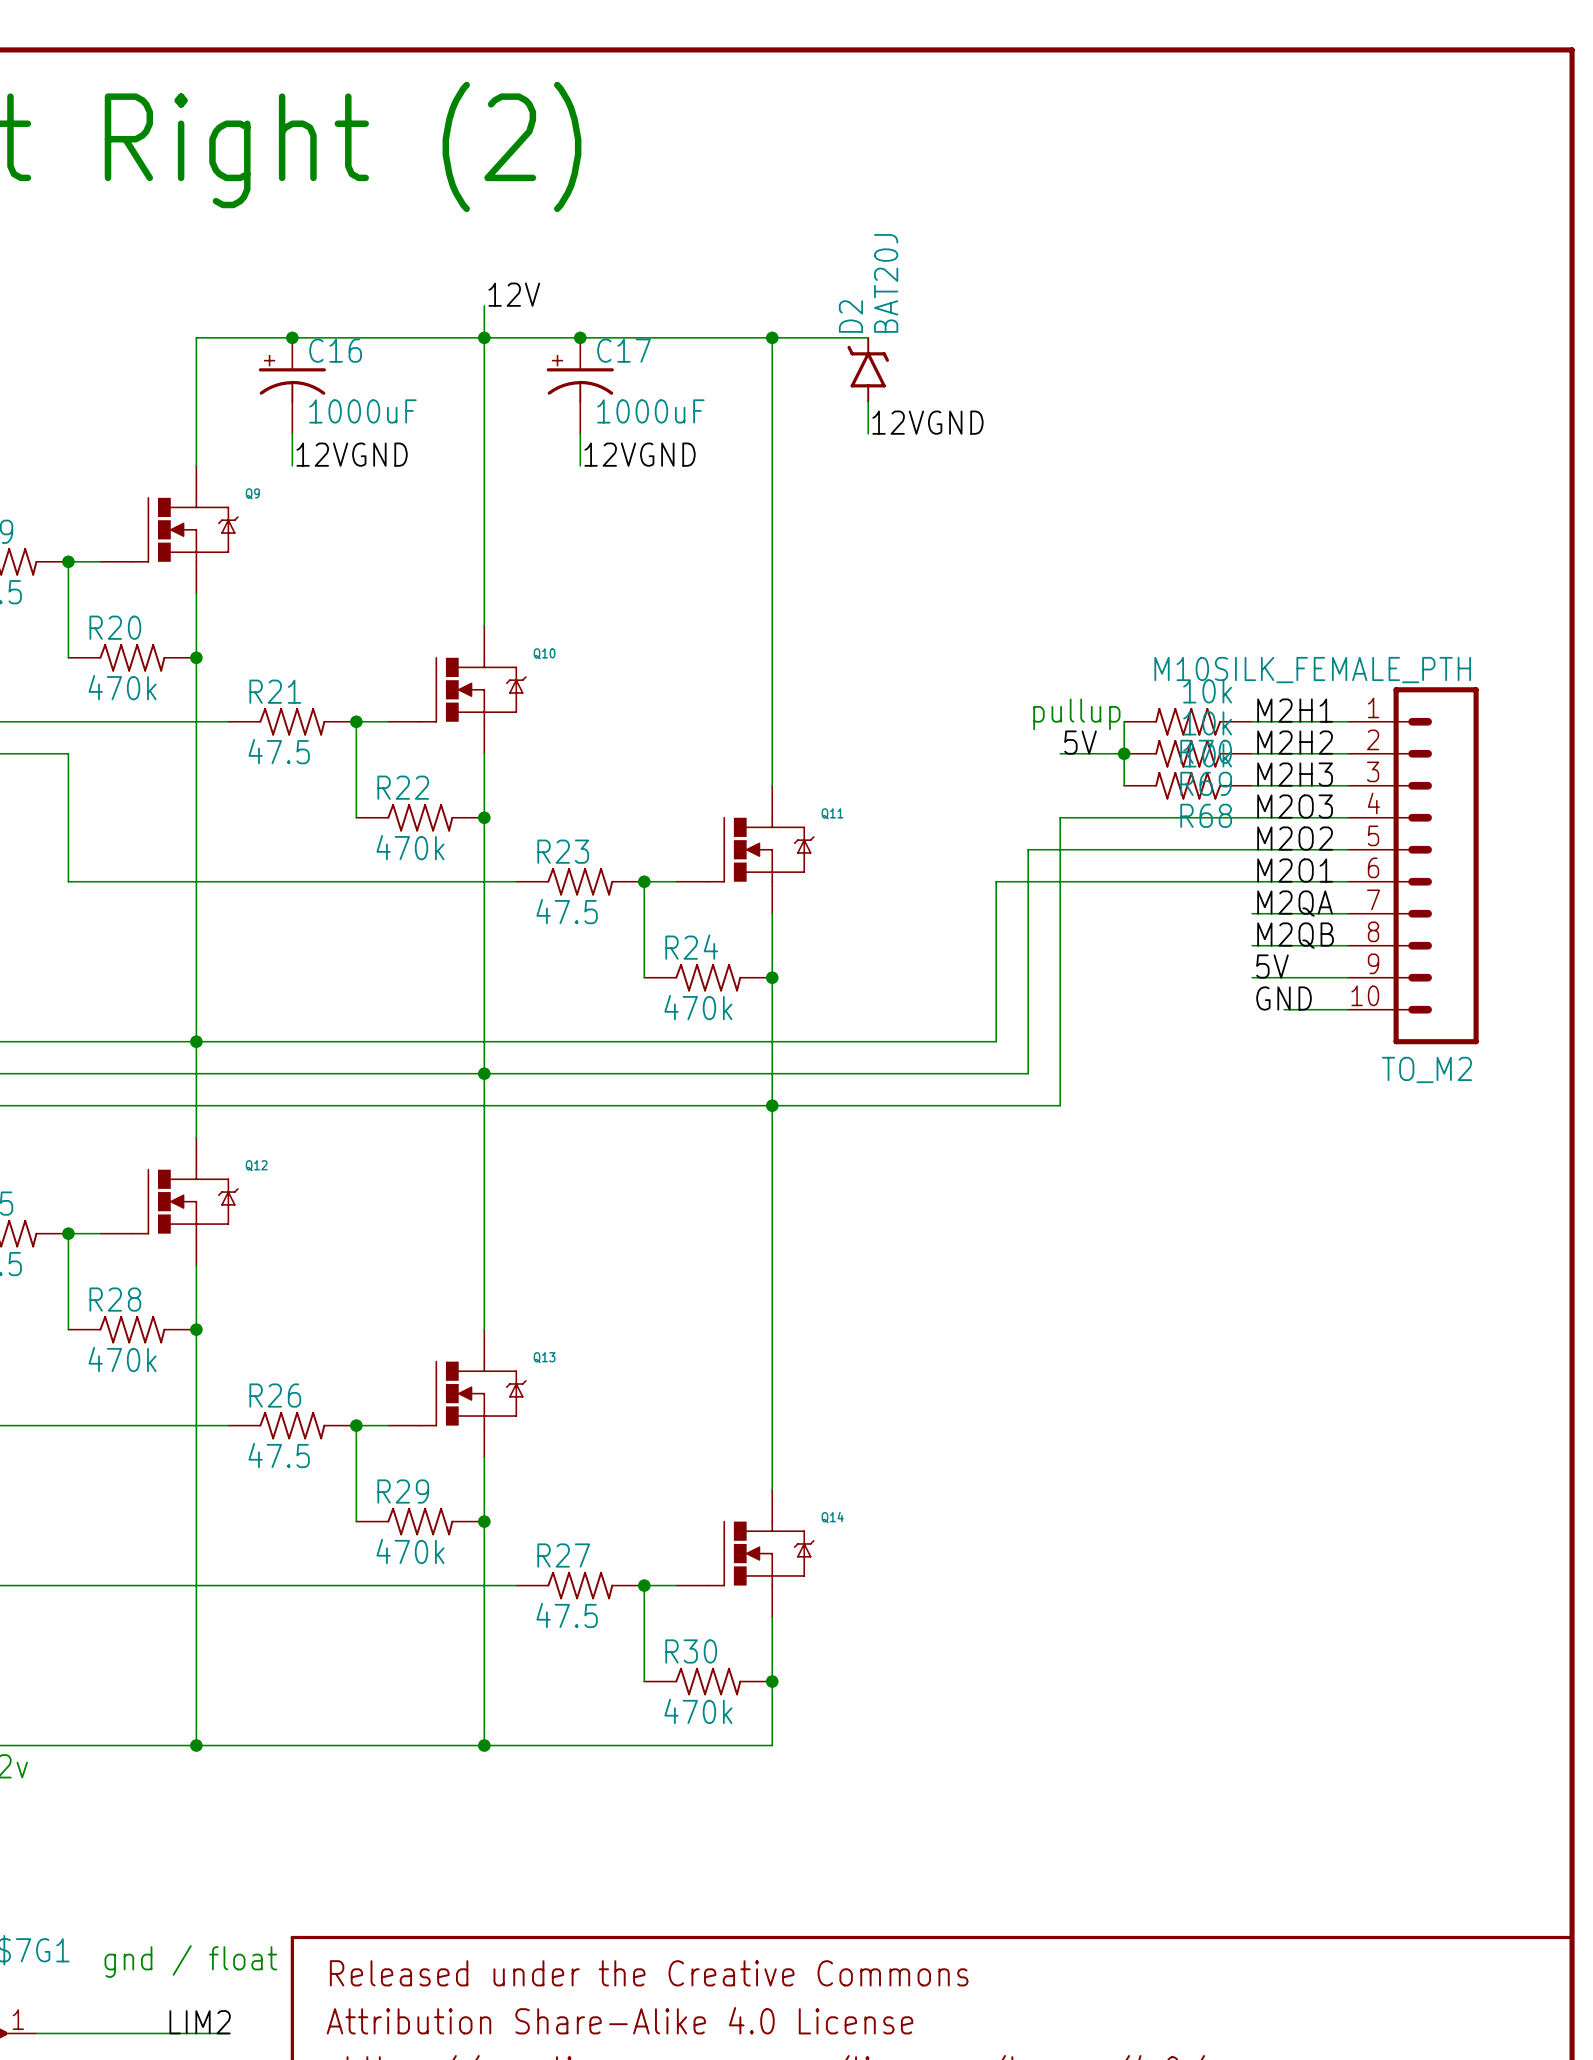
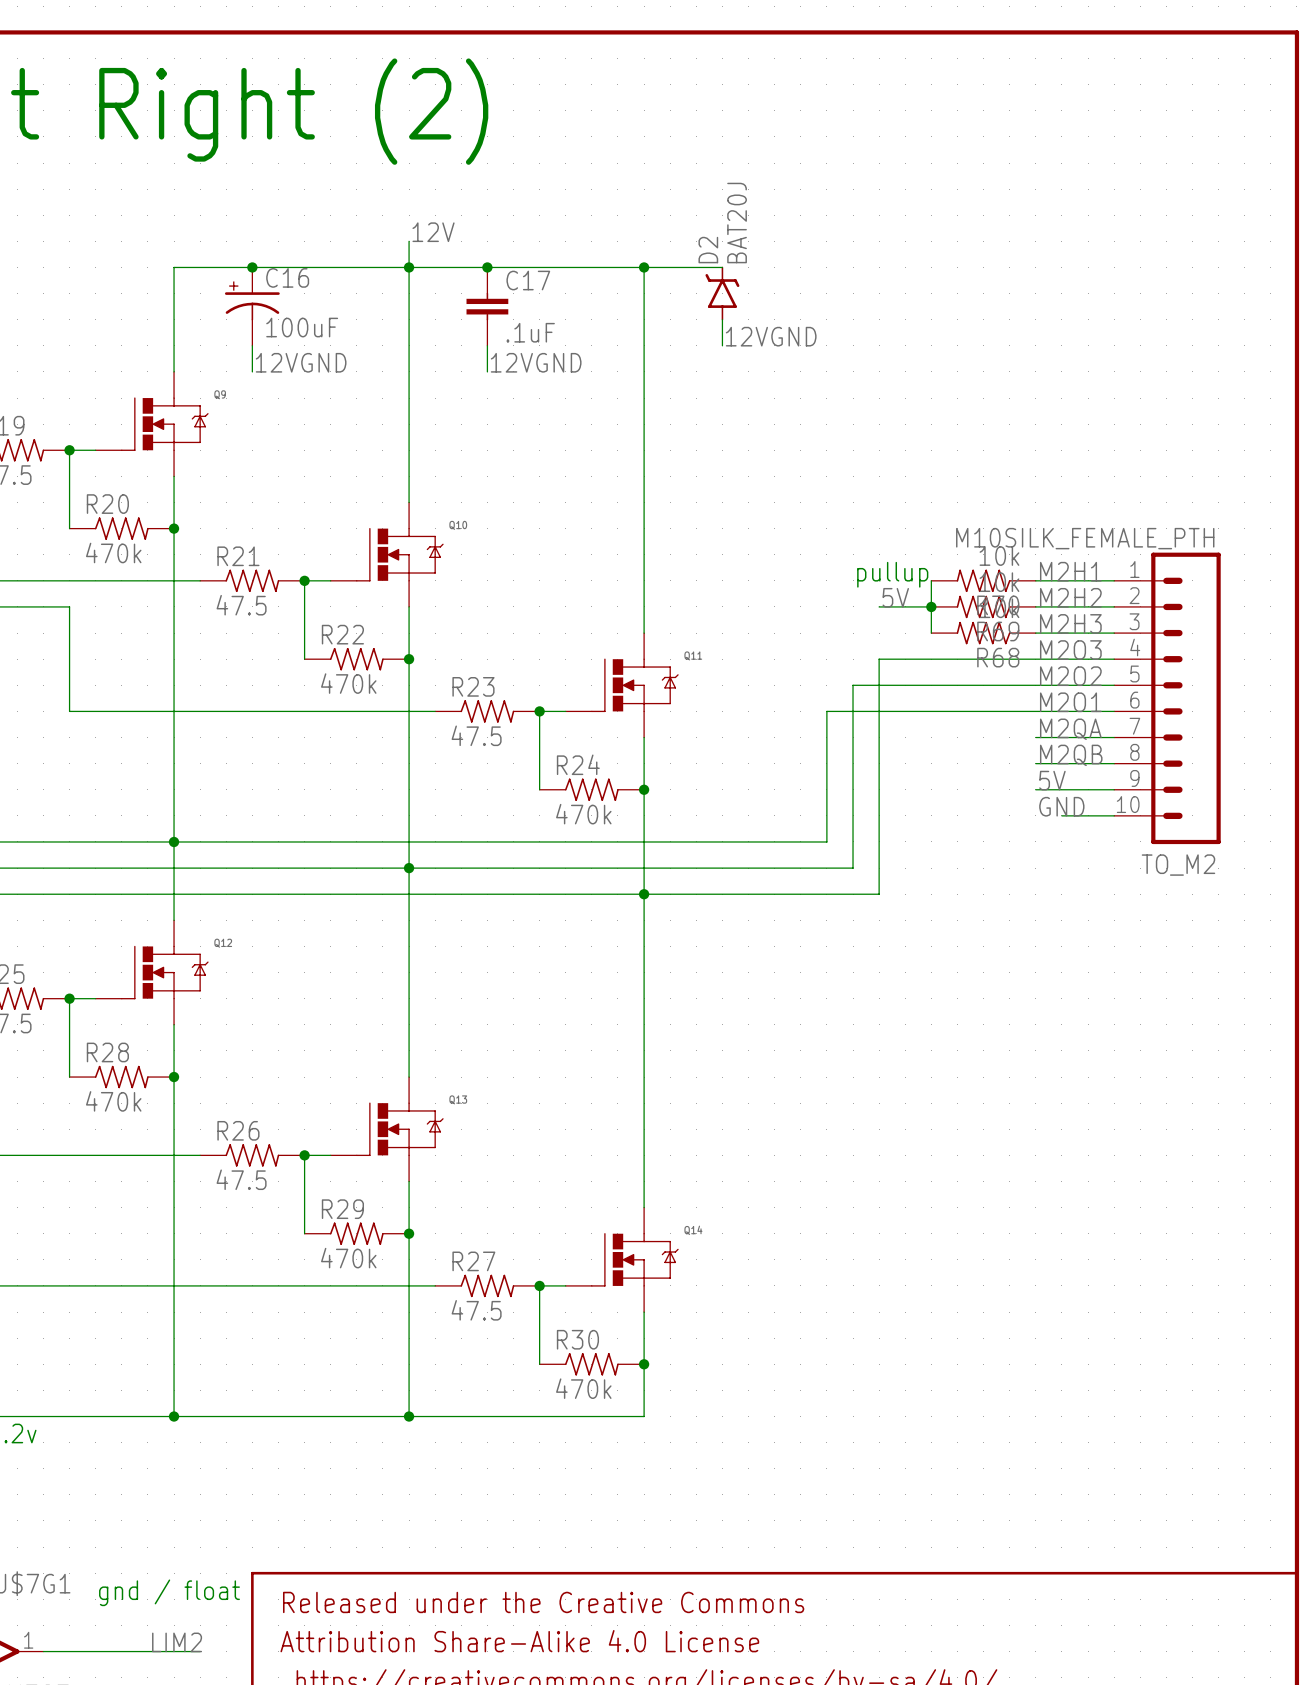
C17 symbol: [546, 337, 614, 434] -> [466, 267, 509, 346]
C16 value: 1000uF (362, 411) -> 100uF (302, 327)
C17 value: 1000uF (650, 411) -> .1uF (530, 332)

